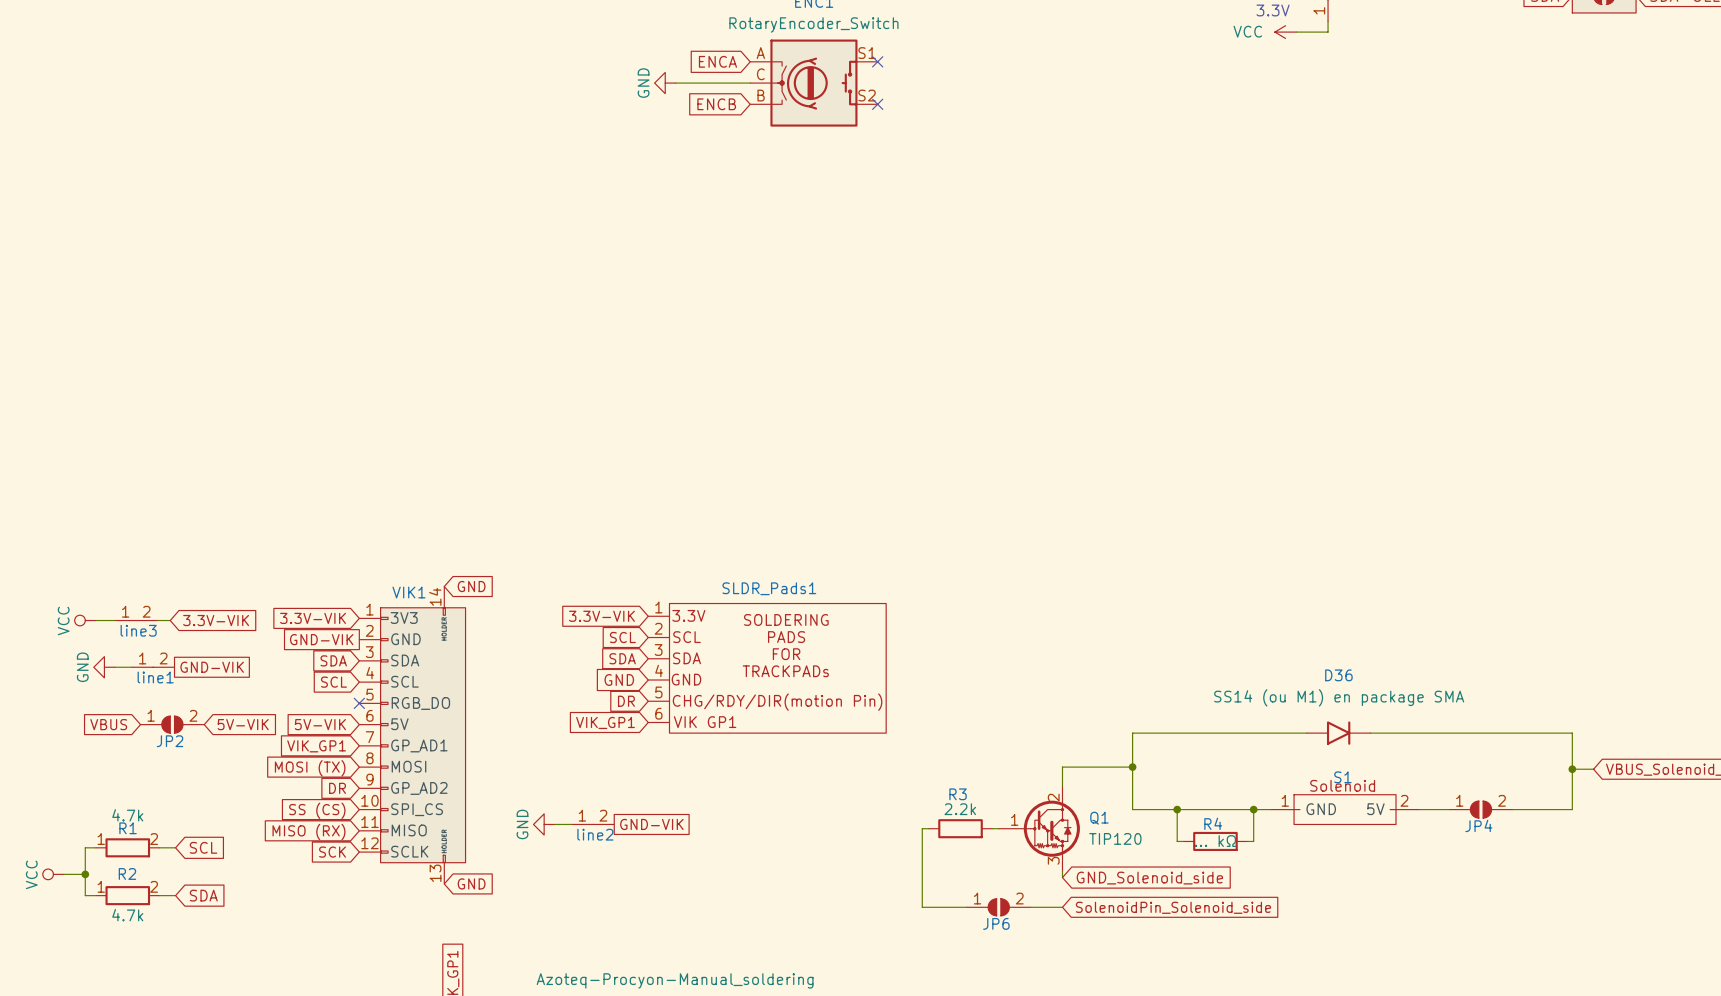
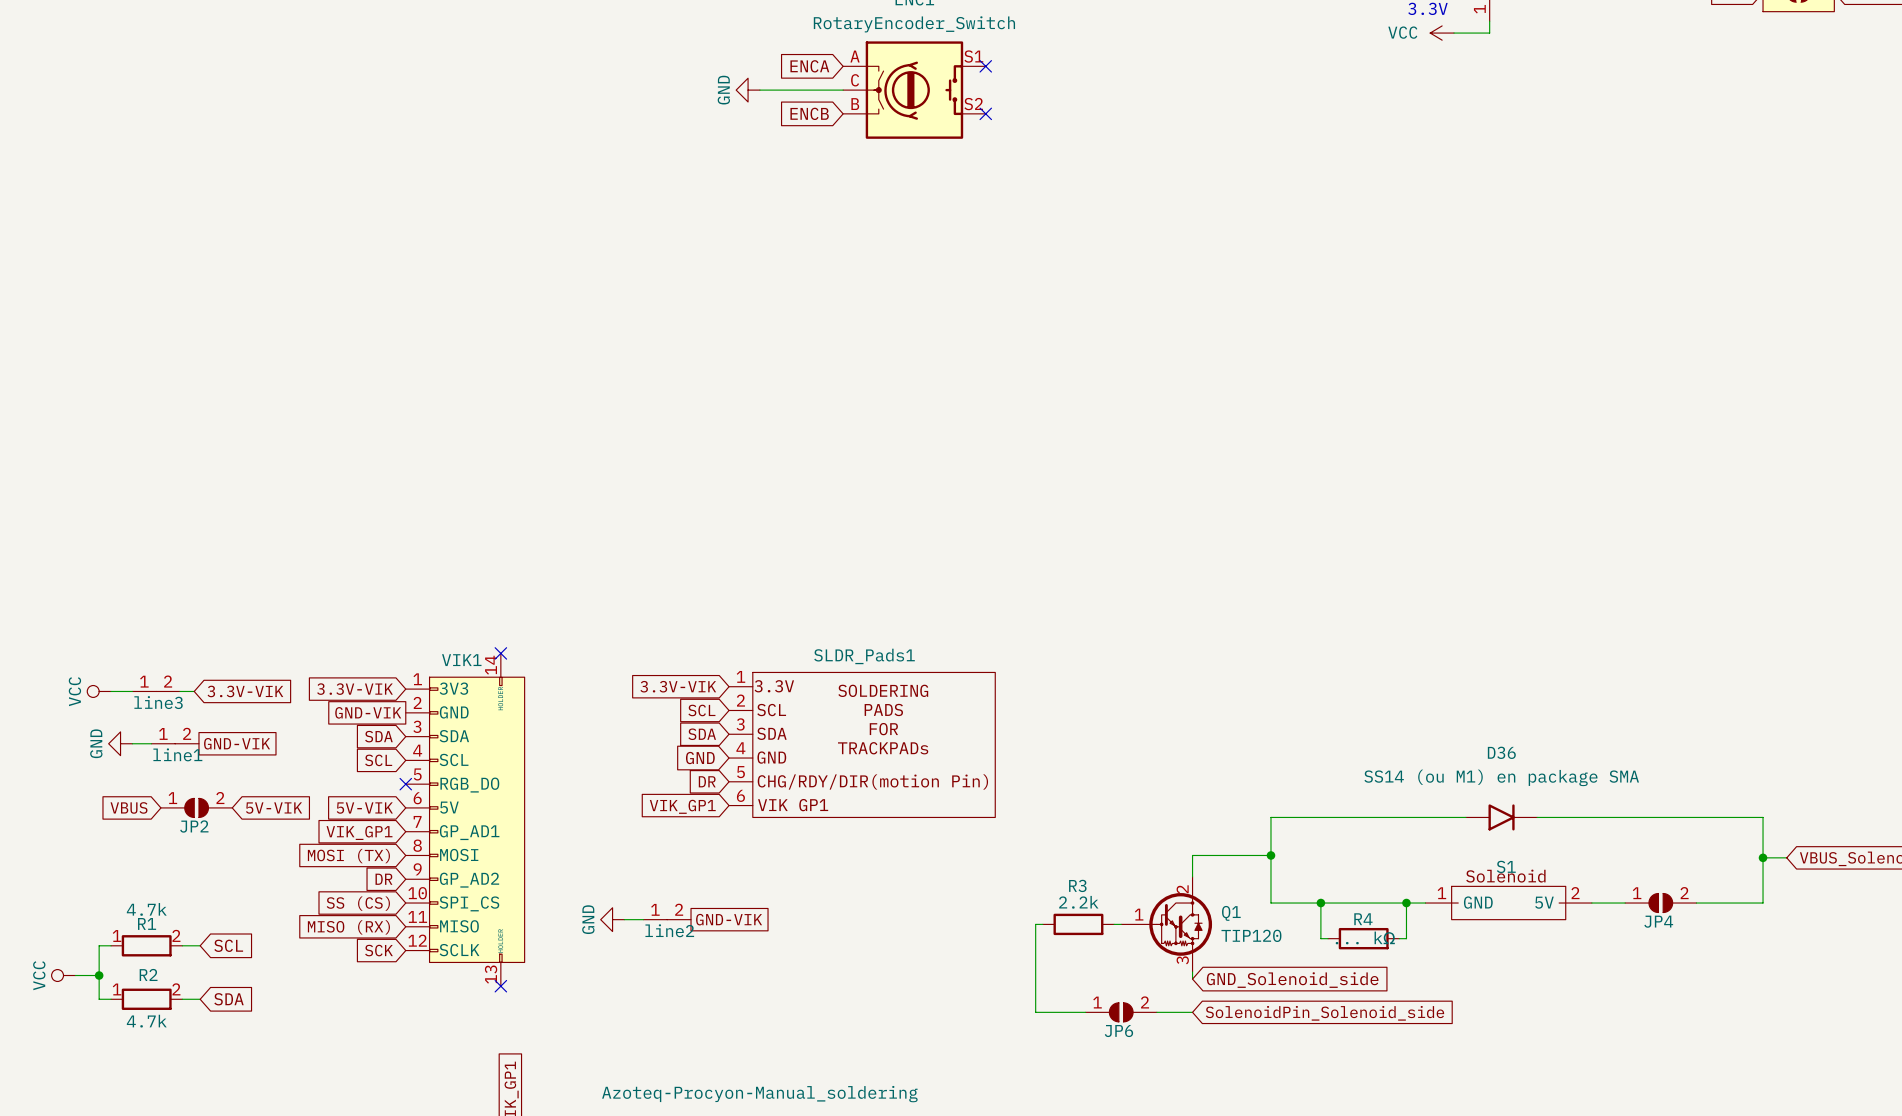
no-connect mark: none -> (500, 653)
global label: GND (471, 586) -> none
no-connect mark: none -> (500, 986)
global label: GND (471, 883) -> none

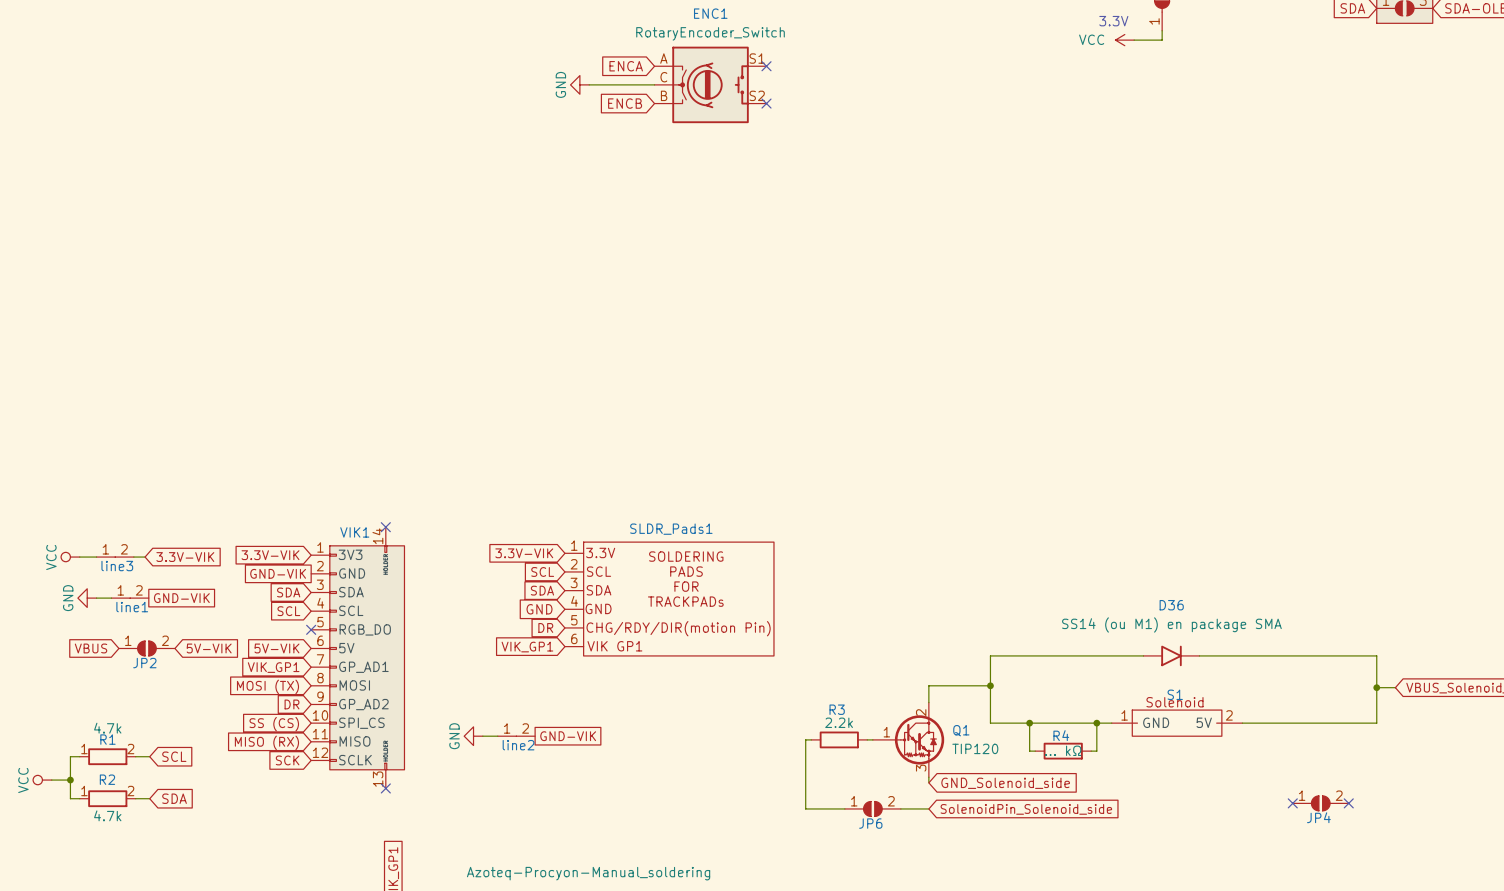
JP4 position: (1660, 903) -> (1320, 803)
no-connect mark: none -> (1292, 803)
no-connect mark: none -> (1348, 803)

